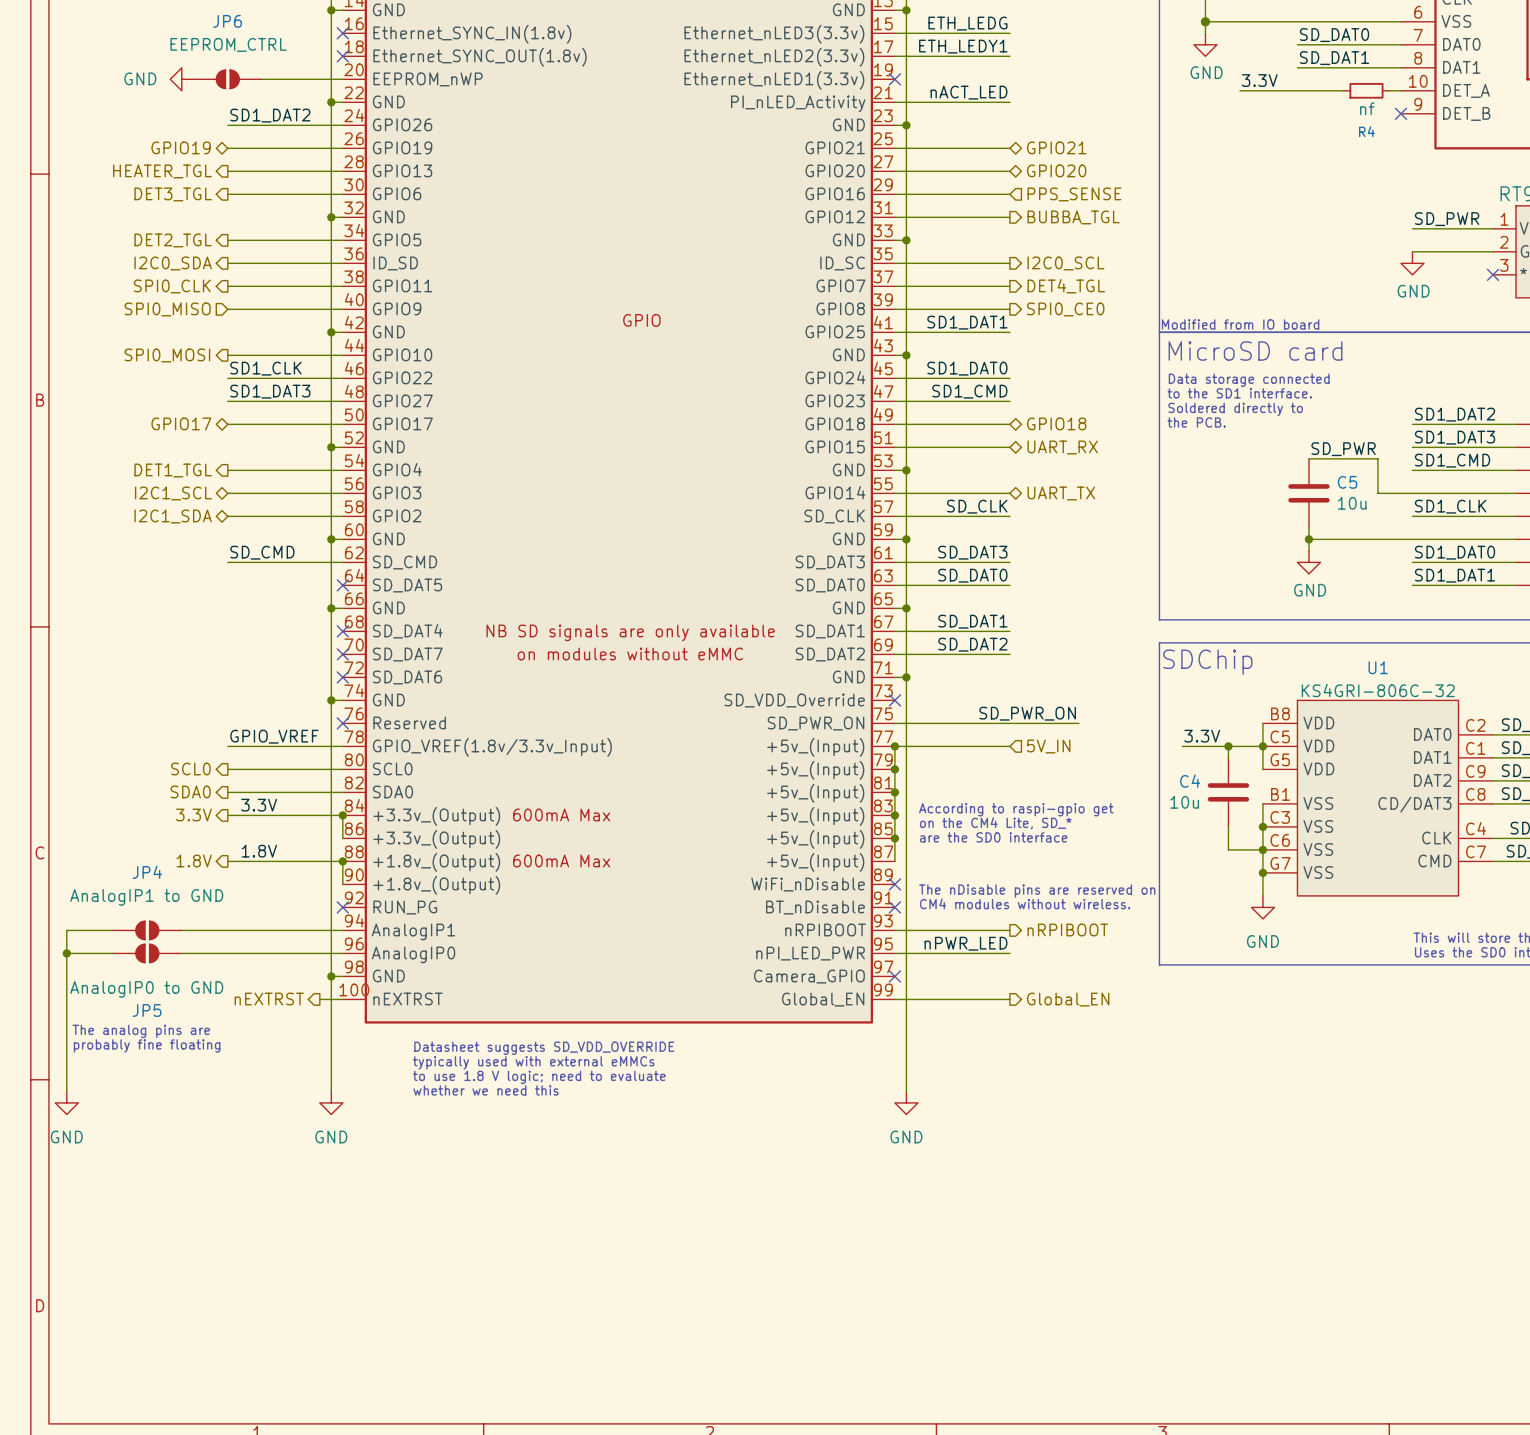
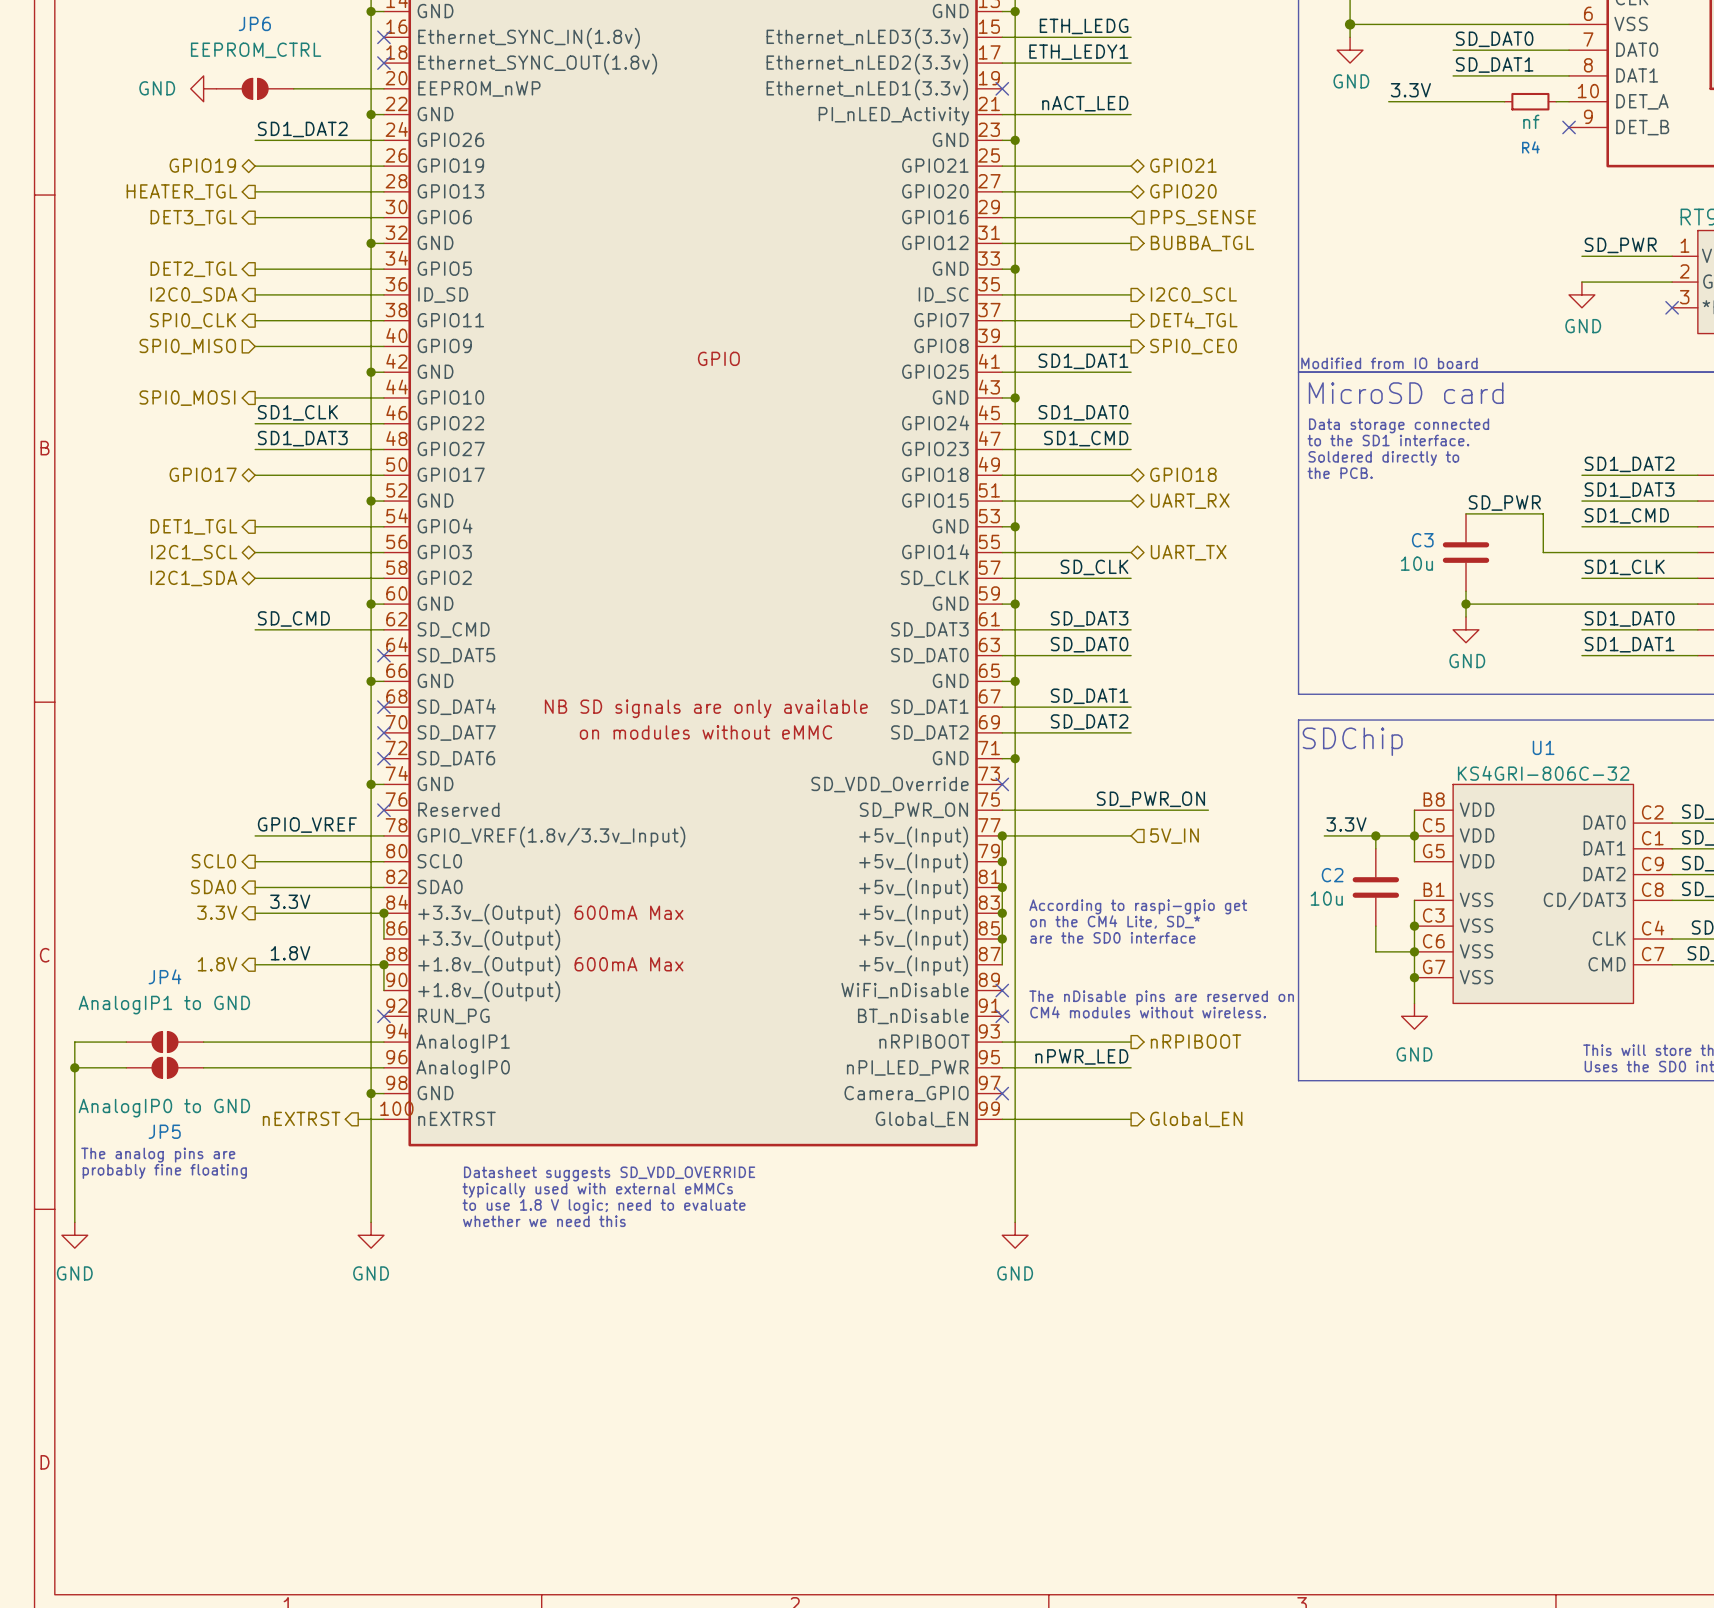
C5 name: C5 (1347, 482) -> C3 (1422, 540)
C5 value position: 10u (1352, 503) -> 10u (1416, 563)
C4 name: C4 (1190, 781) -> C2 (1332, 875)

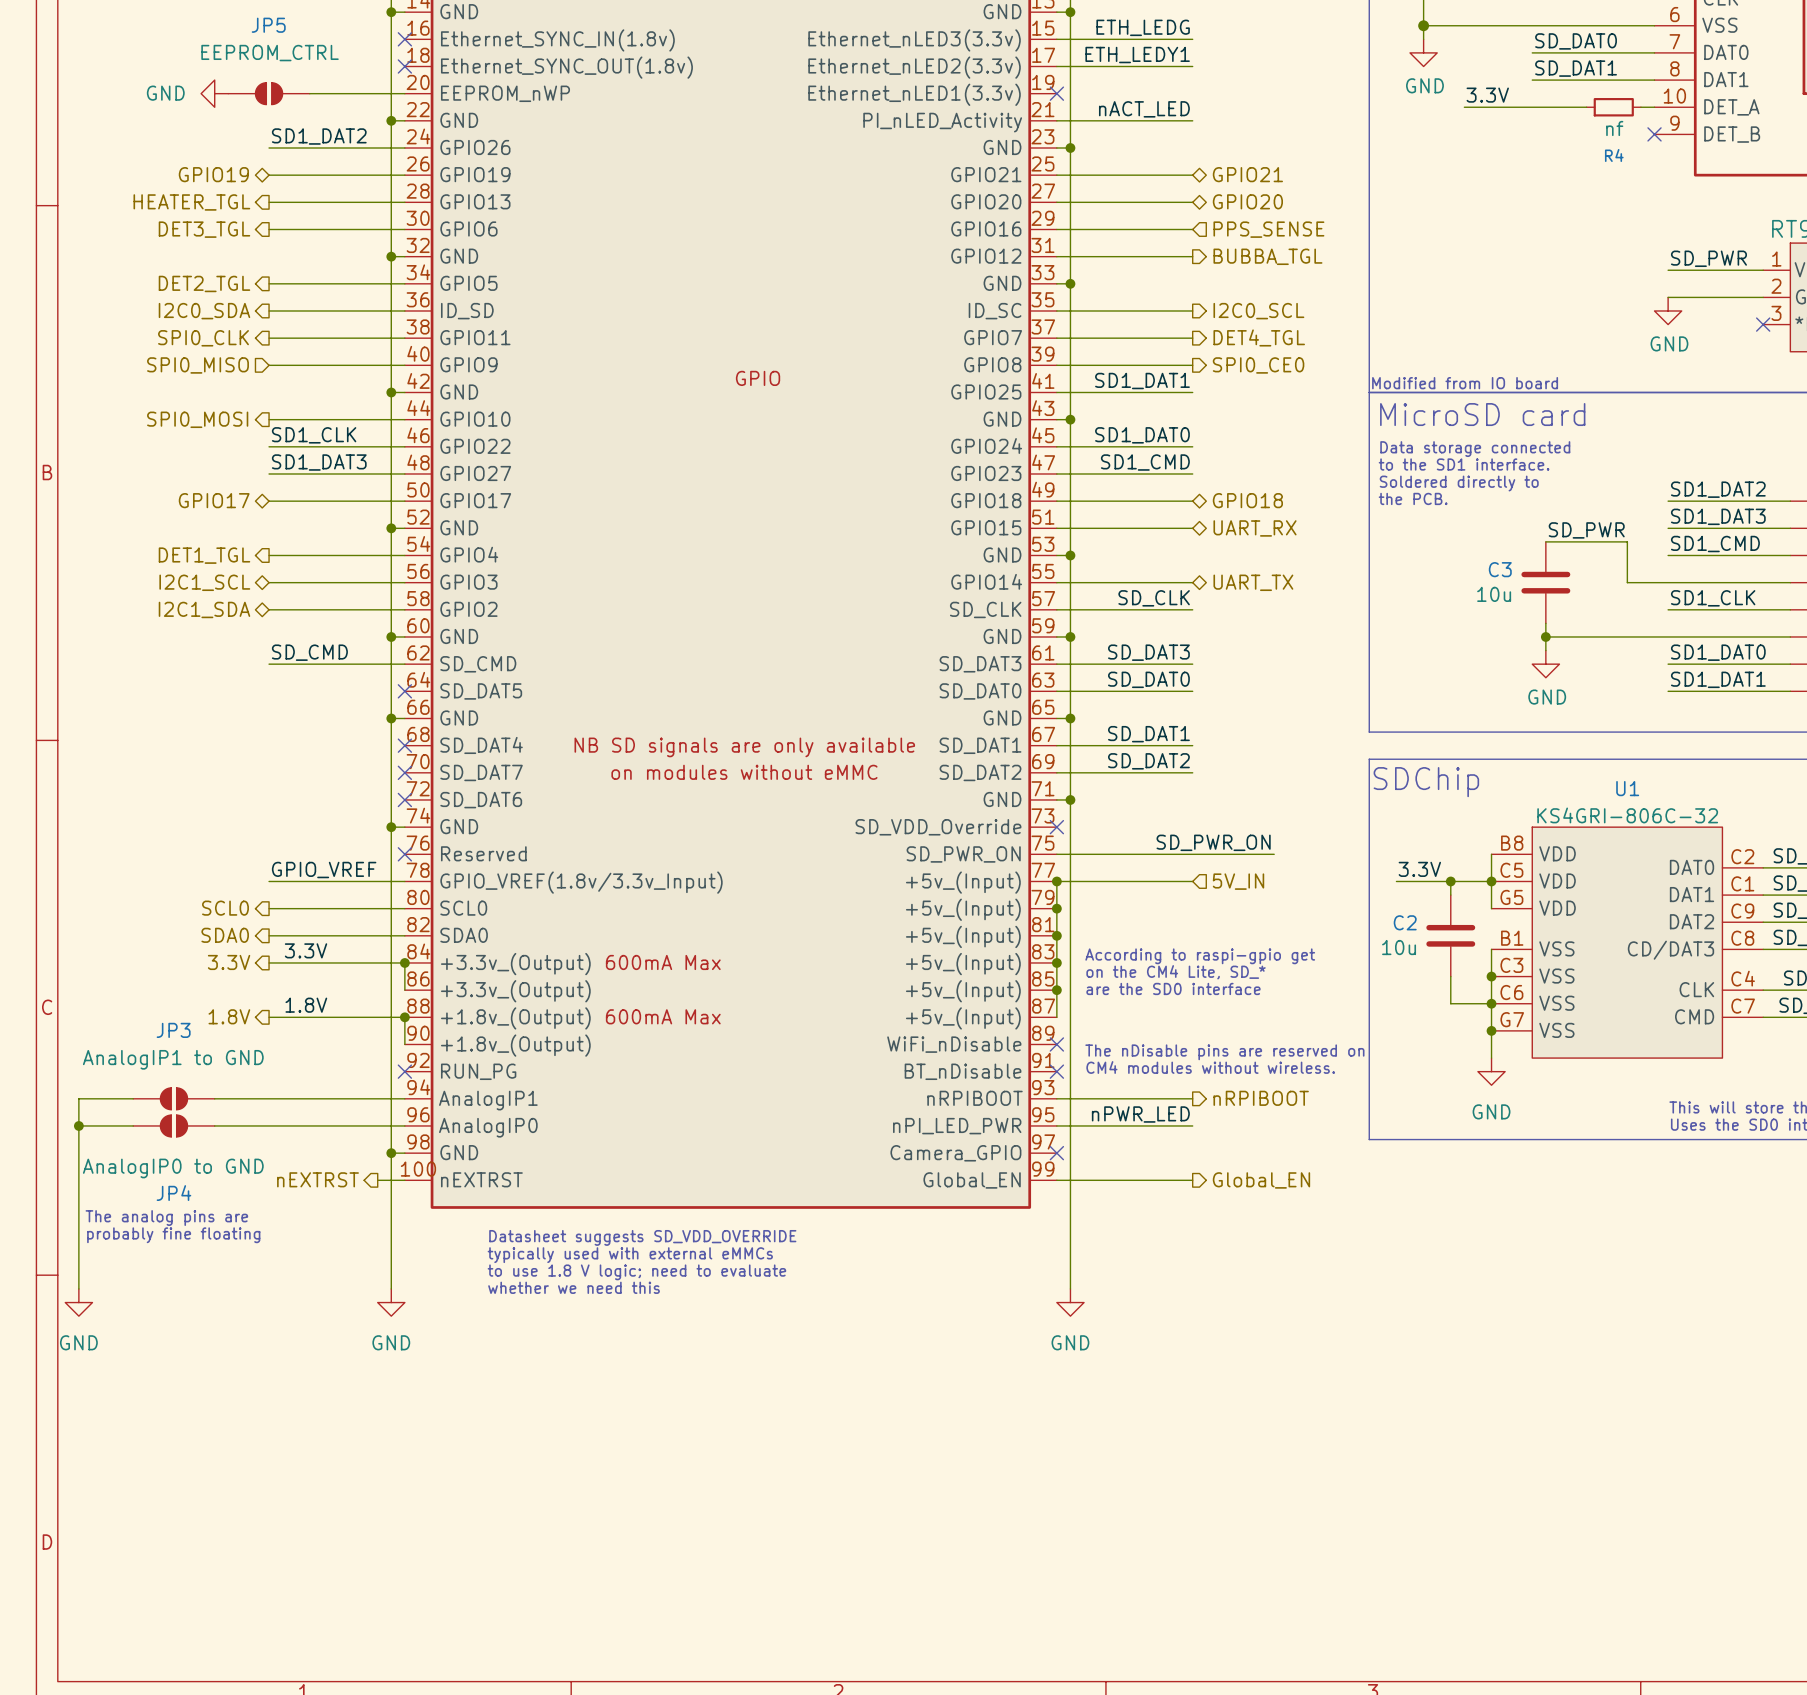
JP6 name: JP6 (254, 23) -> JP5 (268, 25)
JP4 name: JP4 (164, 976) -> JP3 (173, 1030)
JP5 name: JP5 (164, 1131) -> JP4 (173, 1193)

